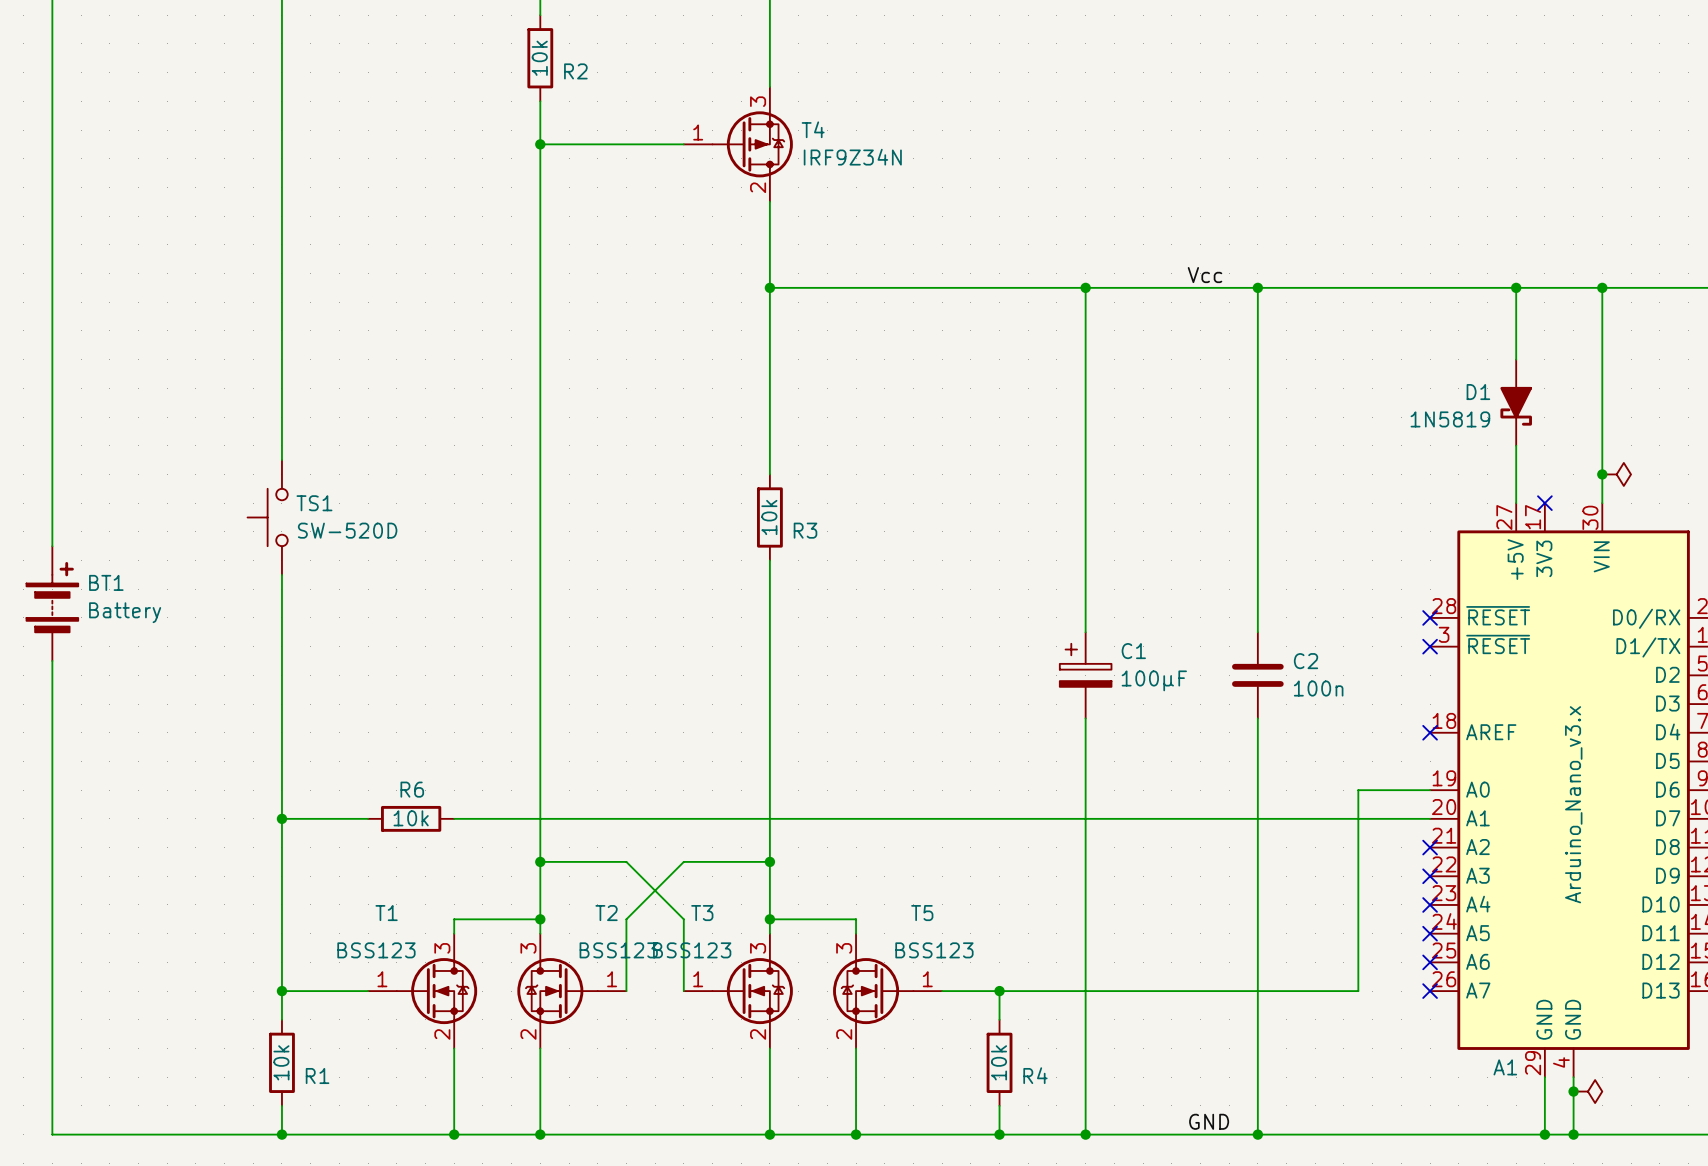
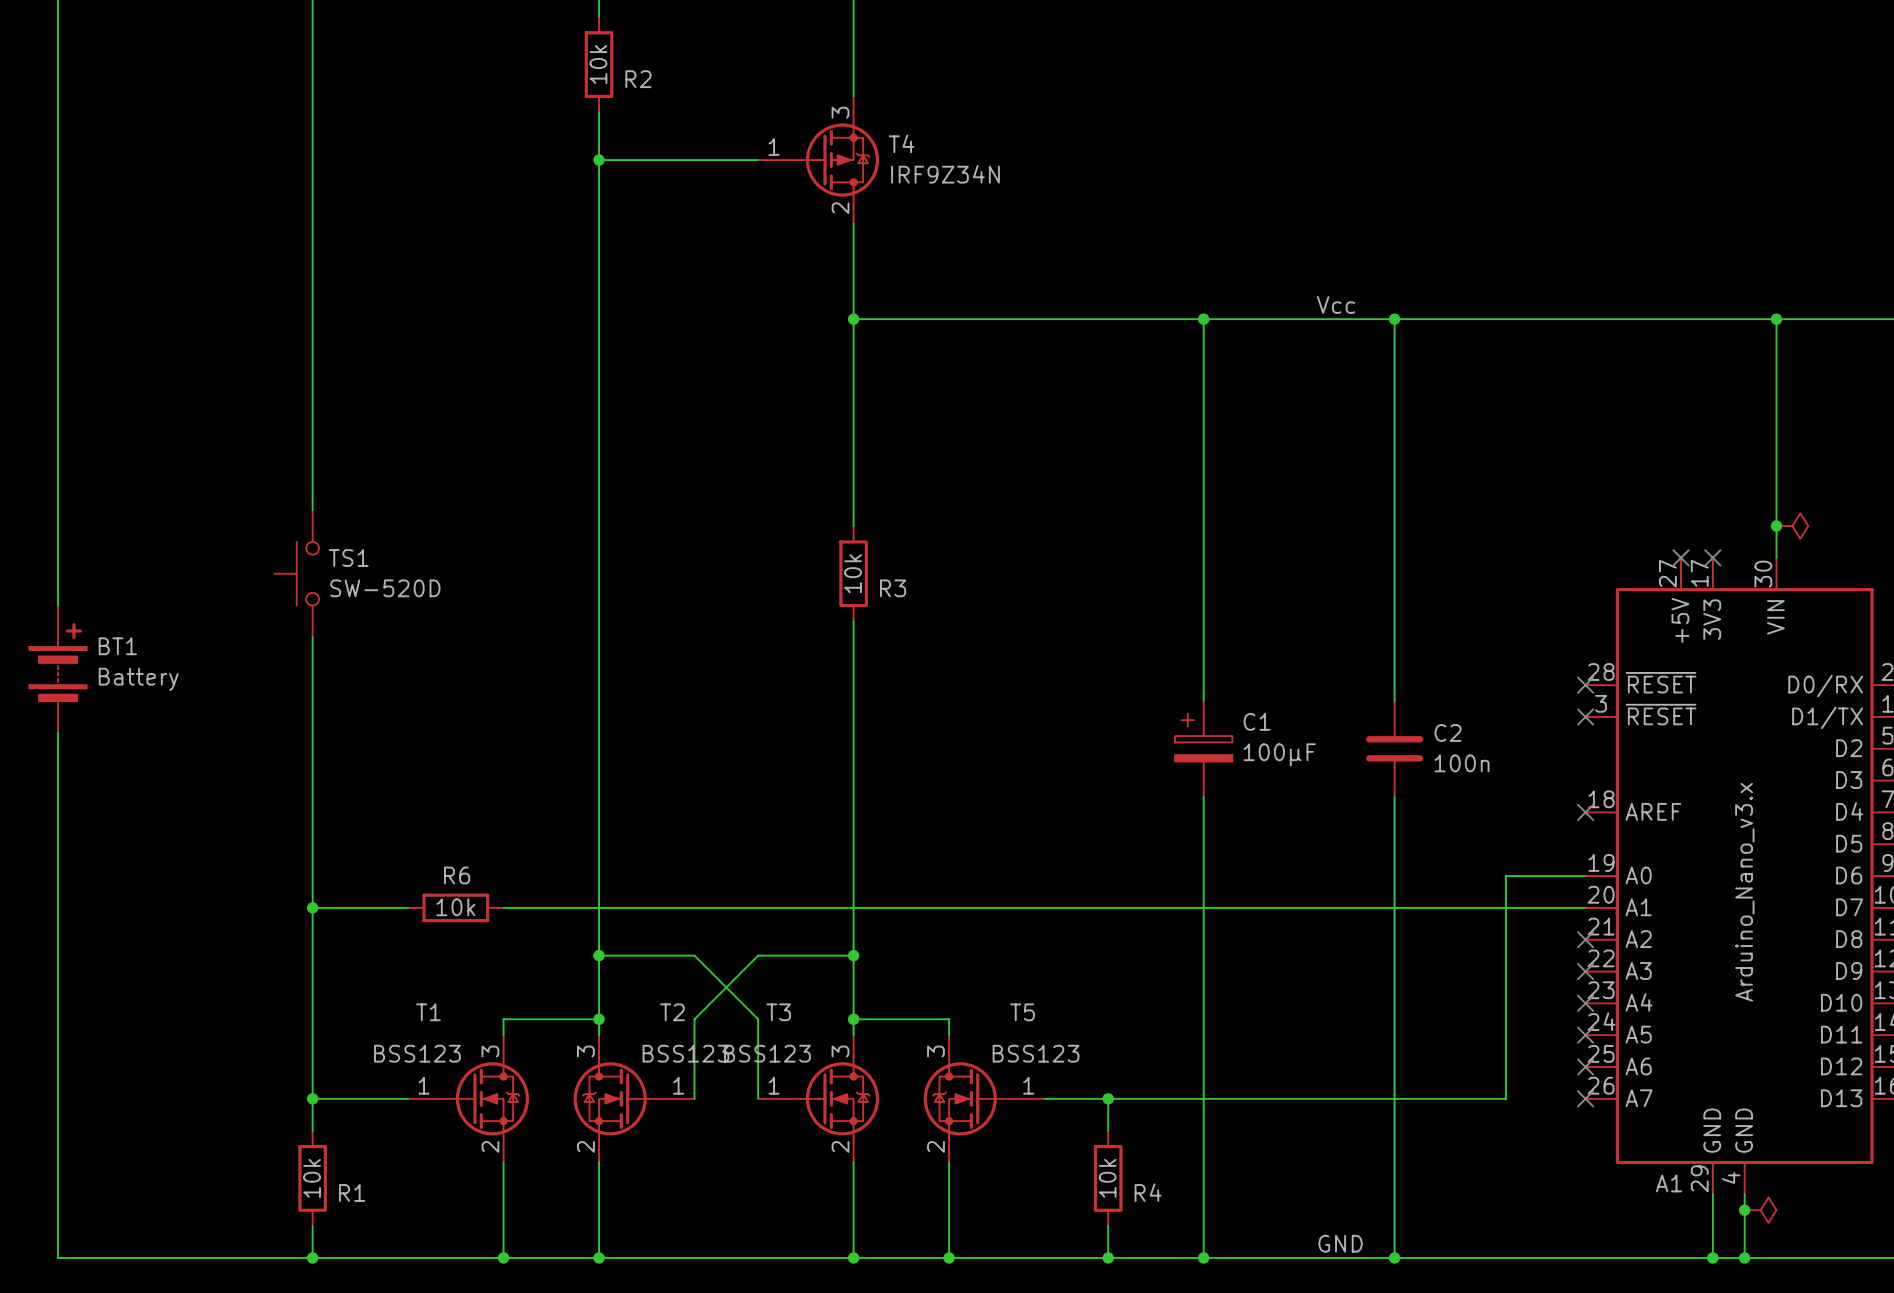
wire: (1516, 287) (1516, 359) -> none
junction: (1516, 287) -> none
D1: 1N5819 (1516, 402) -> none
wire: (1516, 445) (1516, 503) -> none
no-connect mark: none -> (1681, 557)

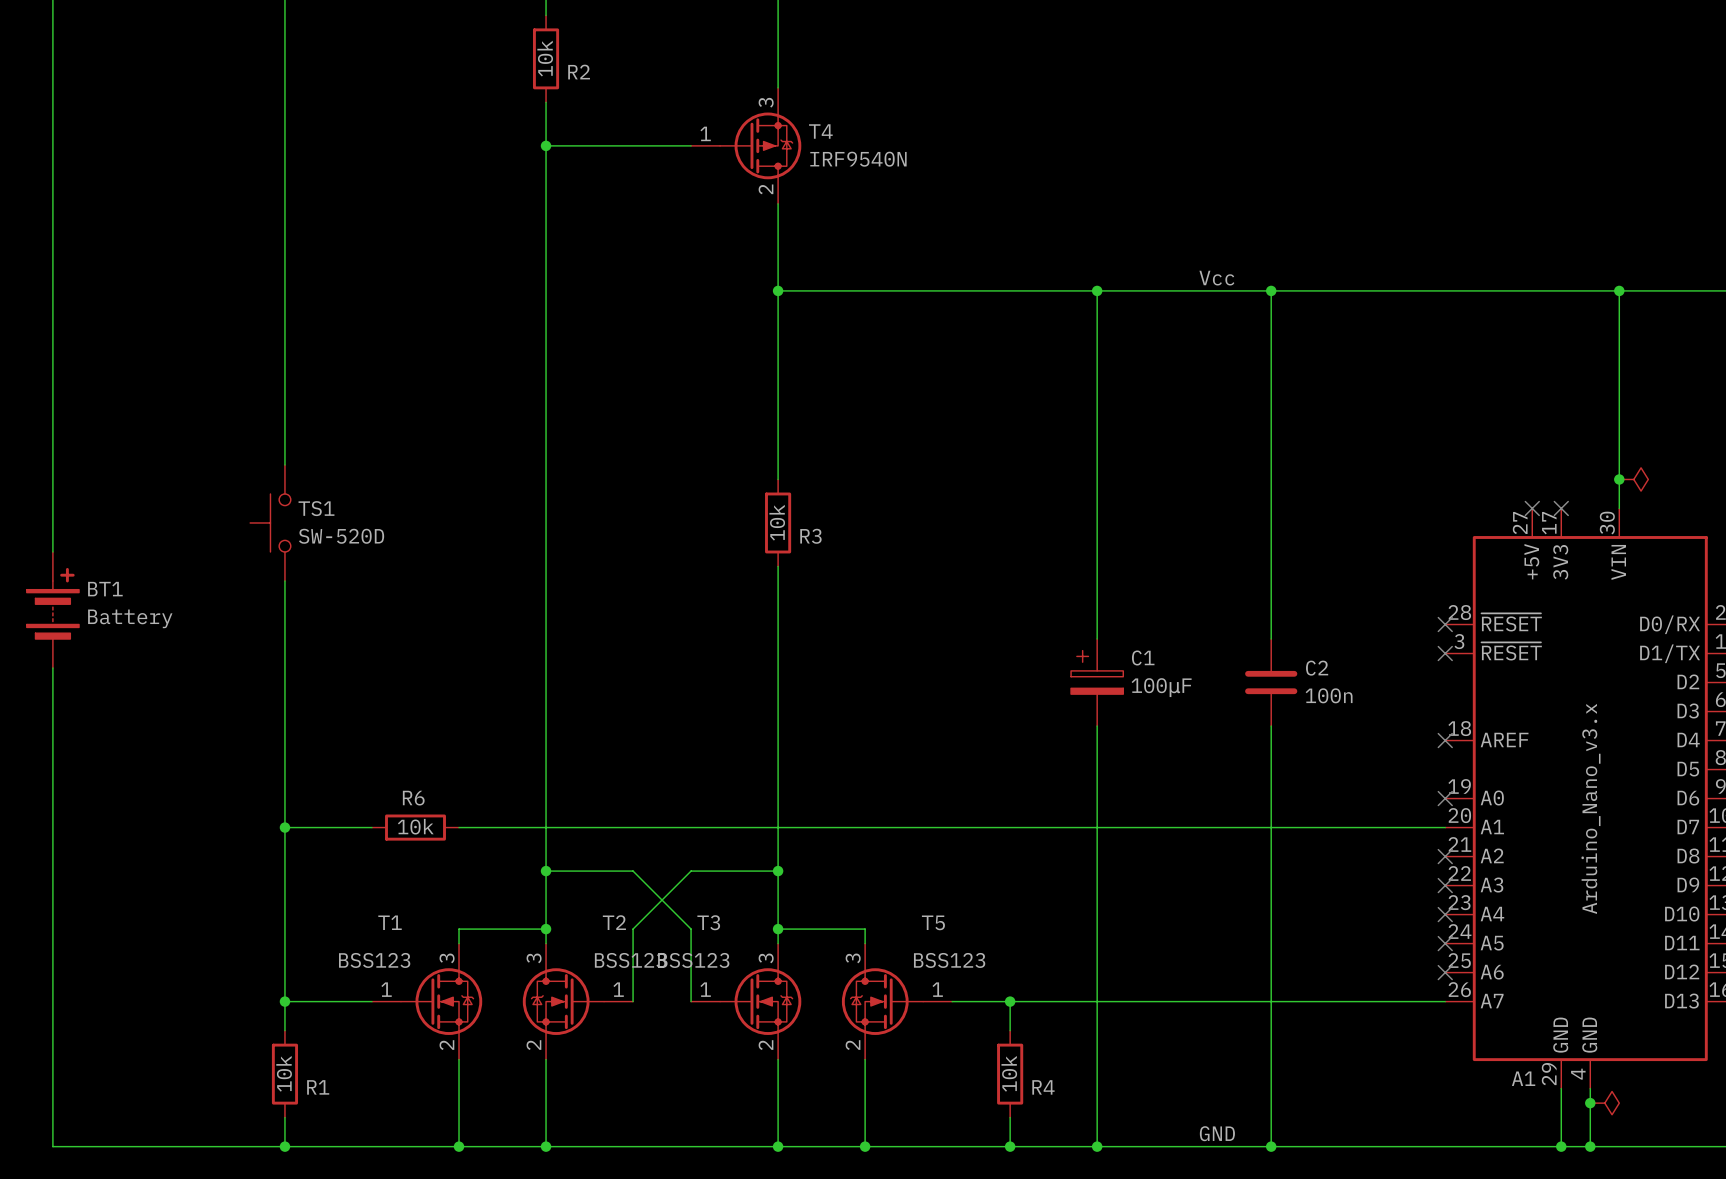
T4 value: IRF9Z34N (945, 174) -> IRF9540N (858, 159)
wire: (1585, 876) (1506, 876) (1506, 1098) -> (1445, 1001) (1372, 1001)
no-connect mark: none -> (1445, 798)
no-connect mark: (1585, 1098) -> none

